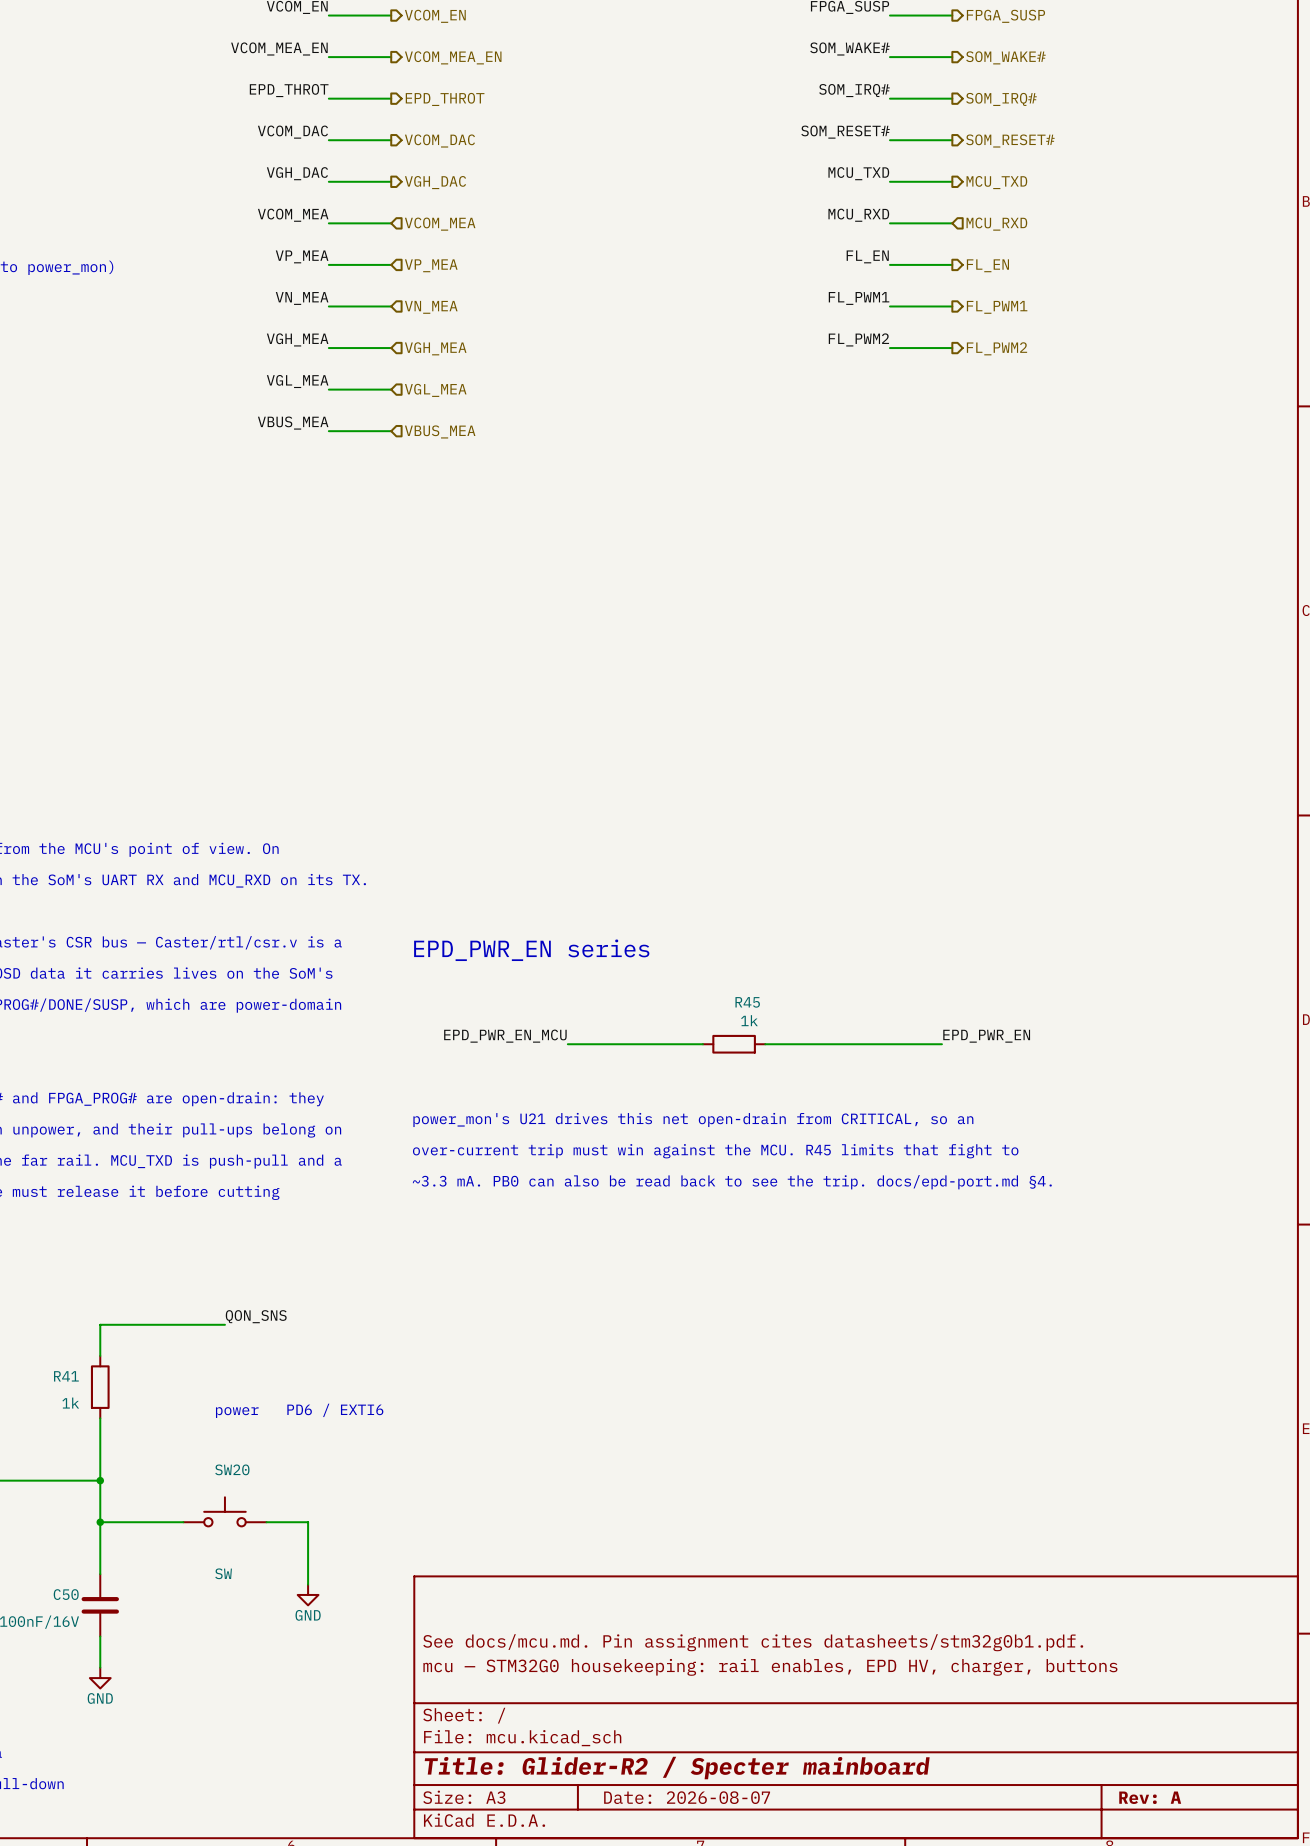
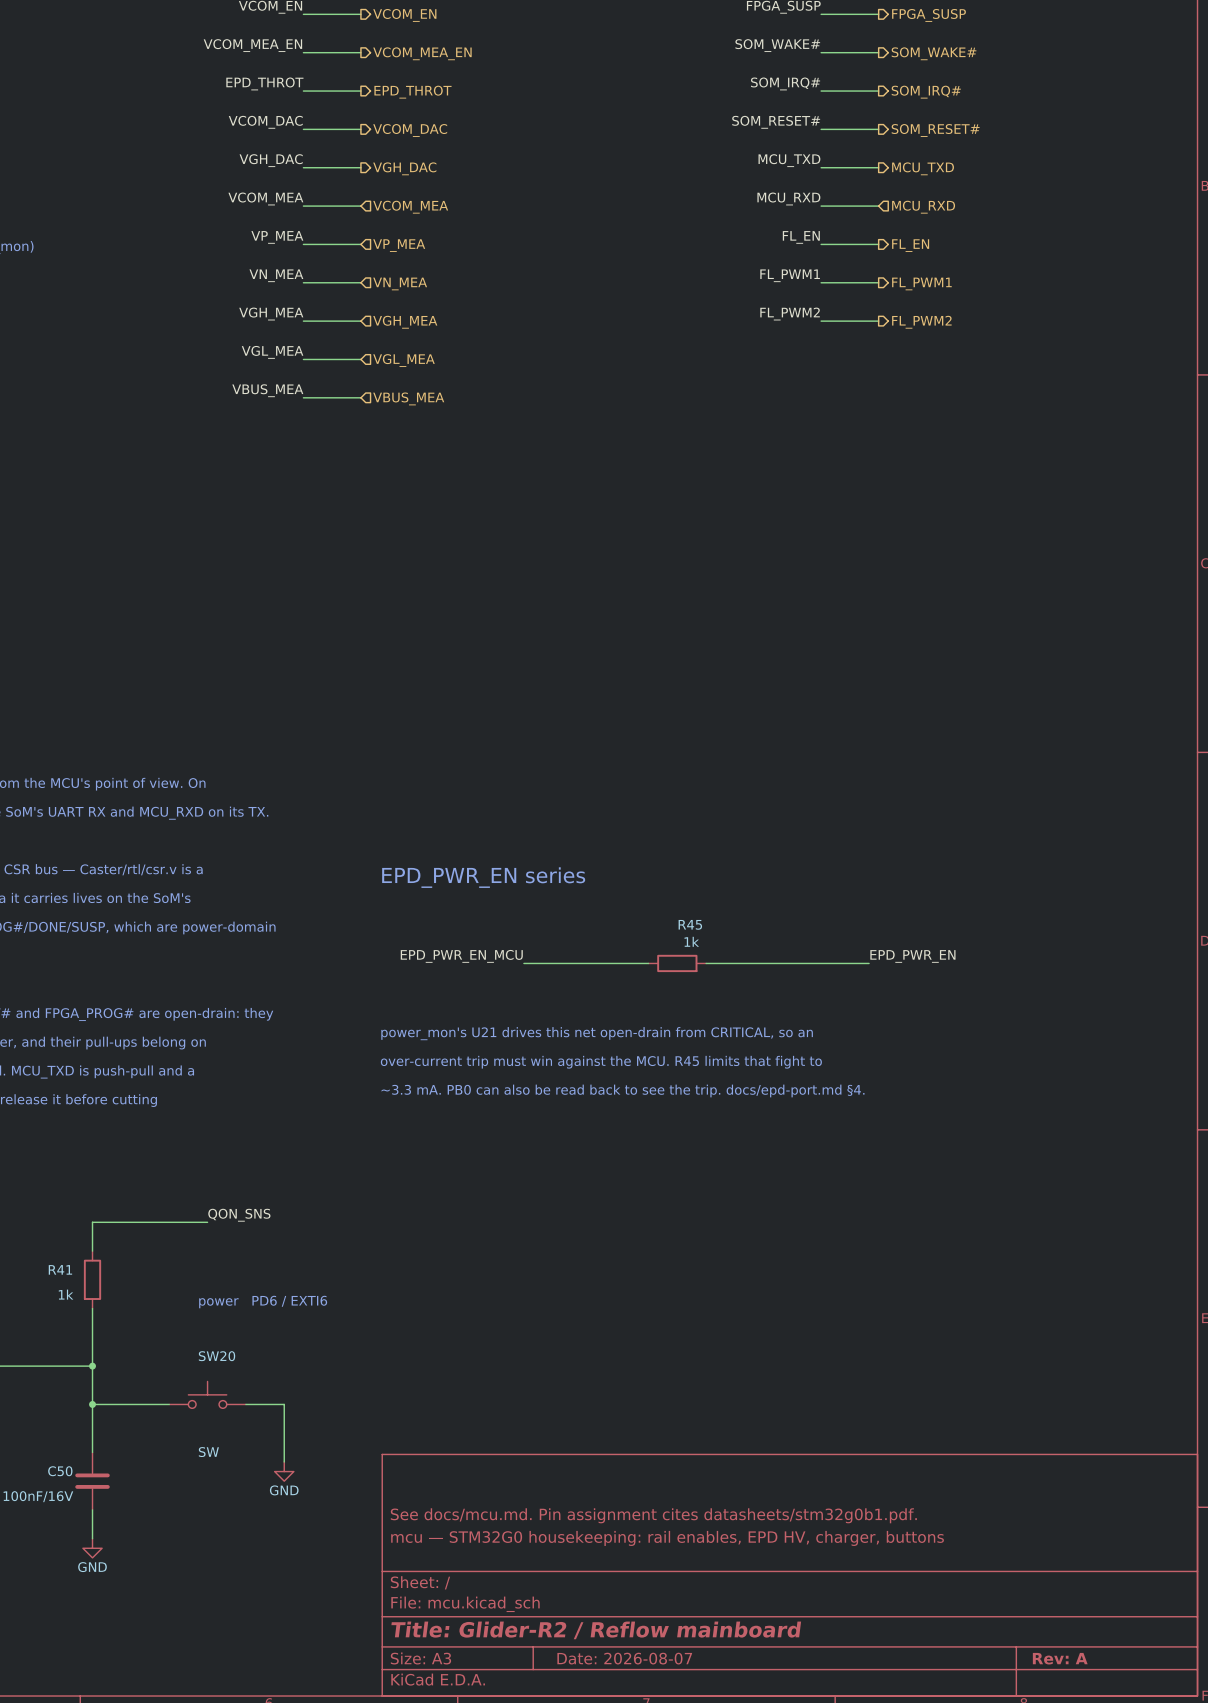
title block: Title: Glider-R2 / Specter mainboard (677, 1768) -> Title: Glider-R2 / Reflow mainboard (596, 1630)

